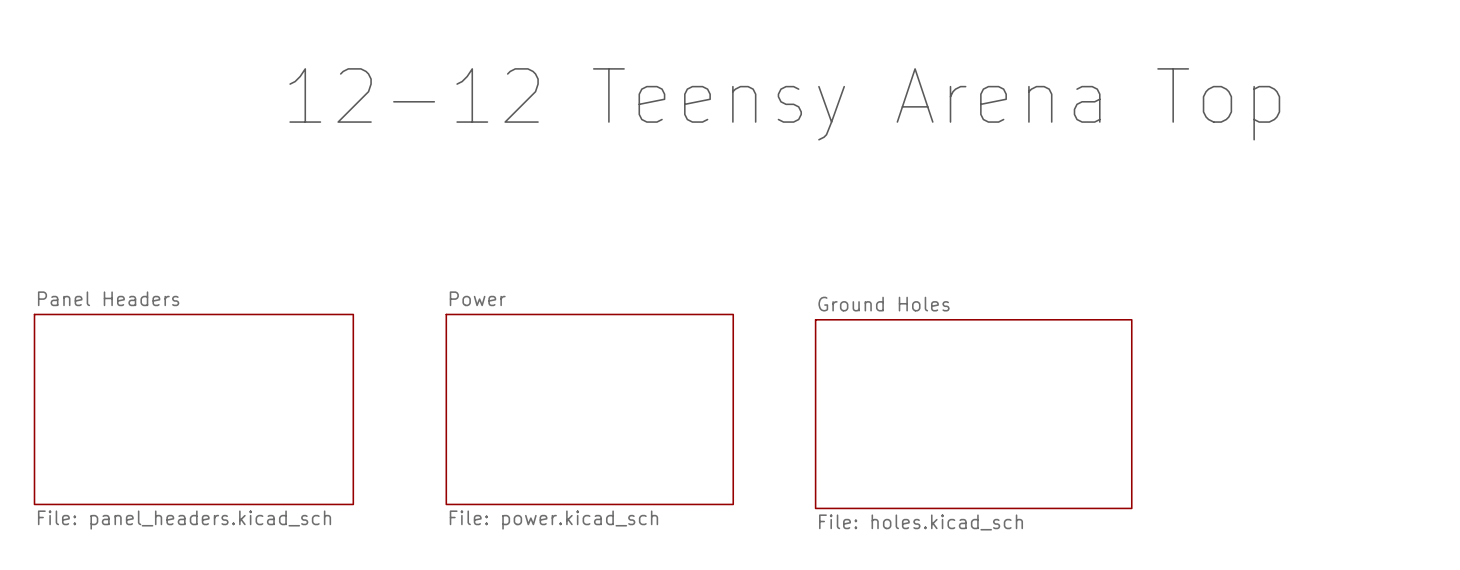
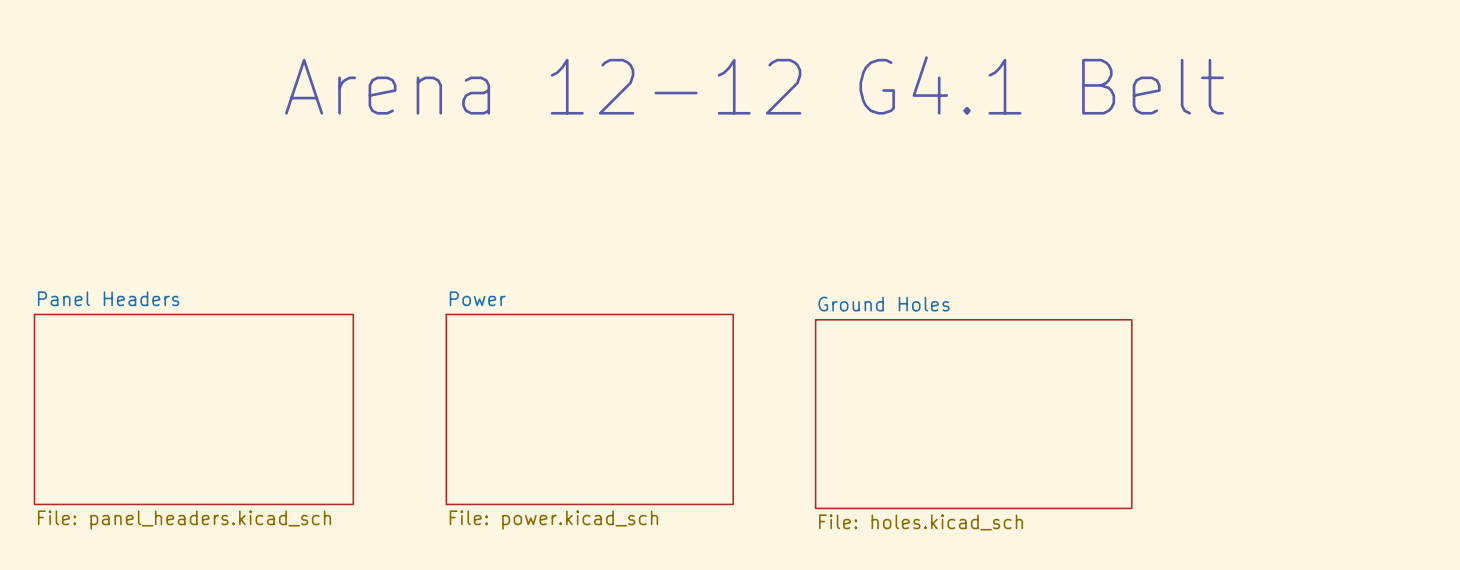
text: none -> Arena 12-12 G4.1 Belt (754, 85)
text: 12-12 Teensy Arena Top (784, 104) -> none

